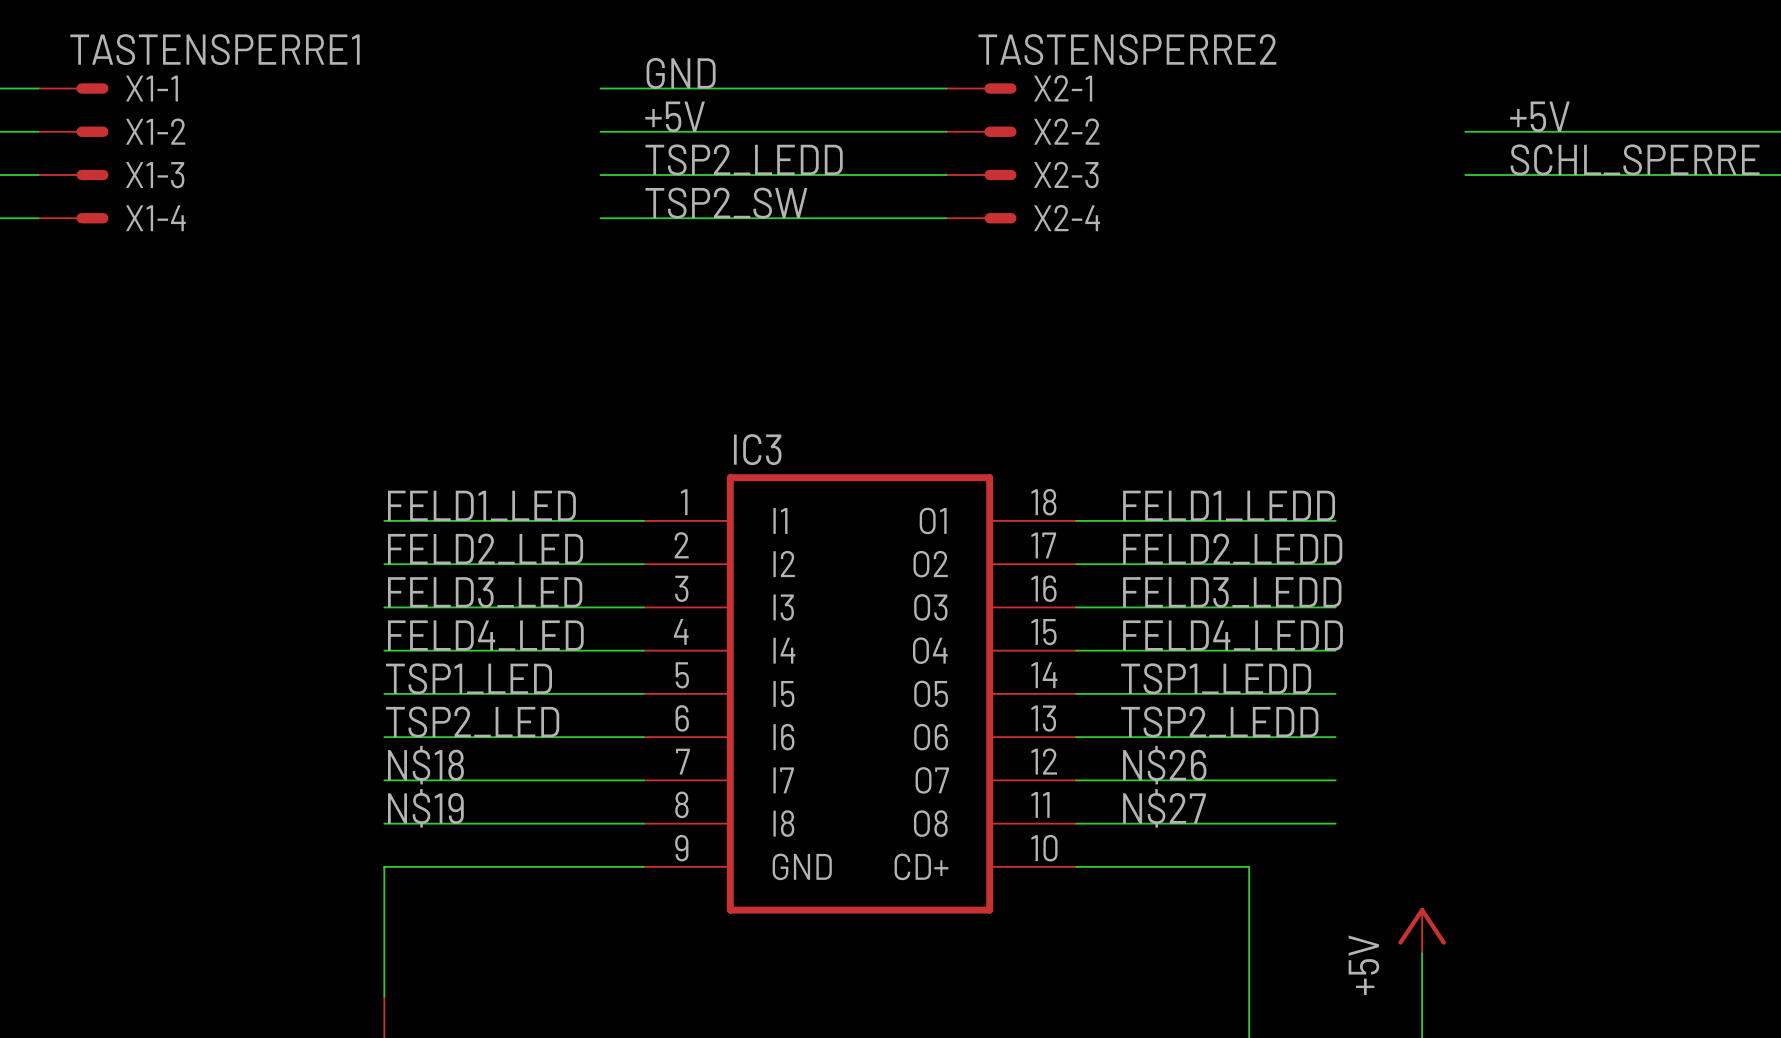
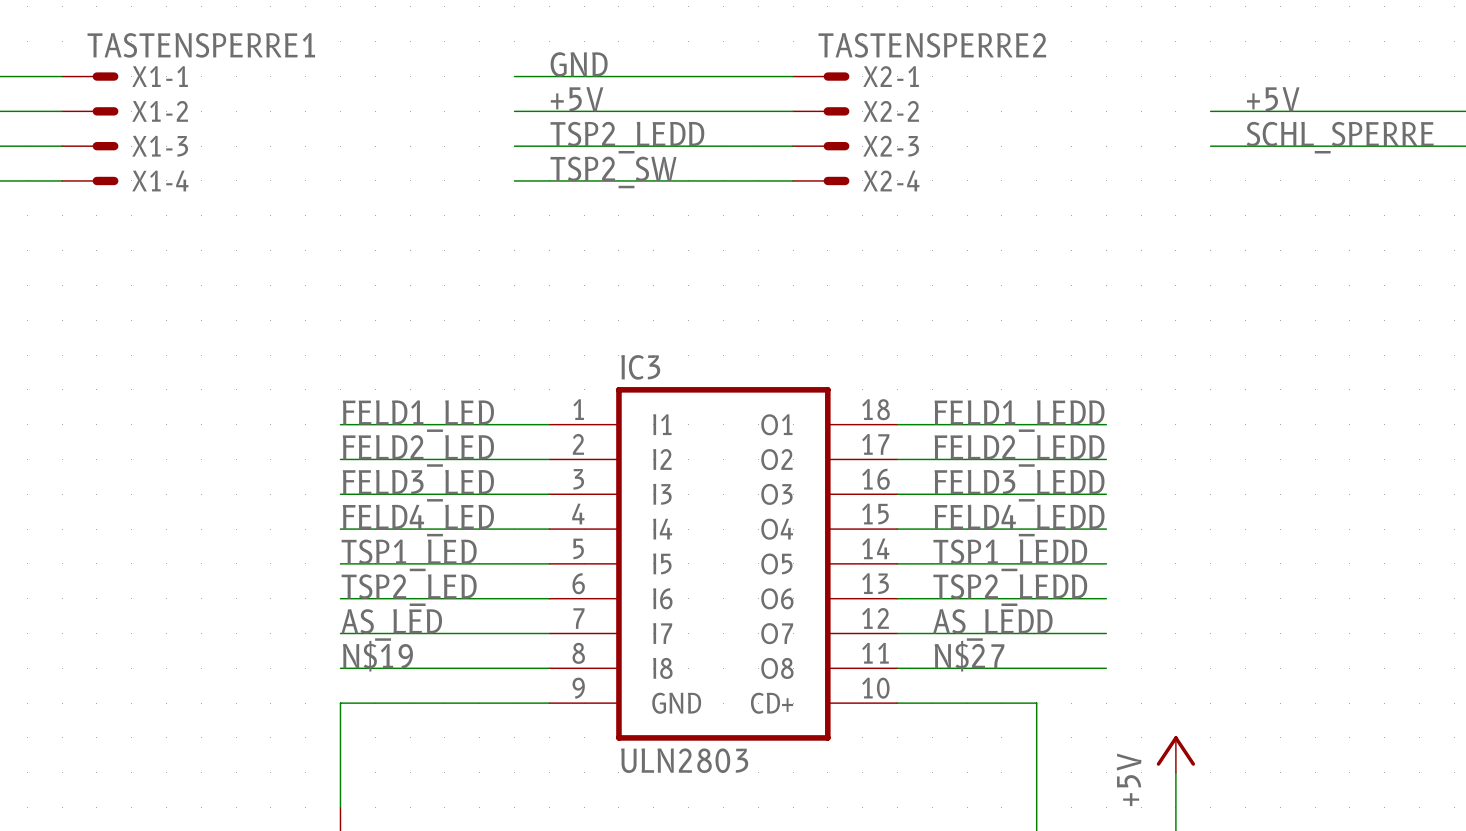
label: N$18 (425, 765) -> AS_LED (391, 624)
label: N$26 (1164, 765) -> AS_LEDD (992, 624)
IC3 value: none -> ULN2803 (684, 760)

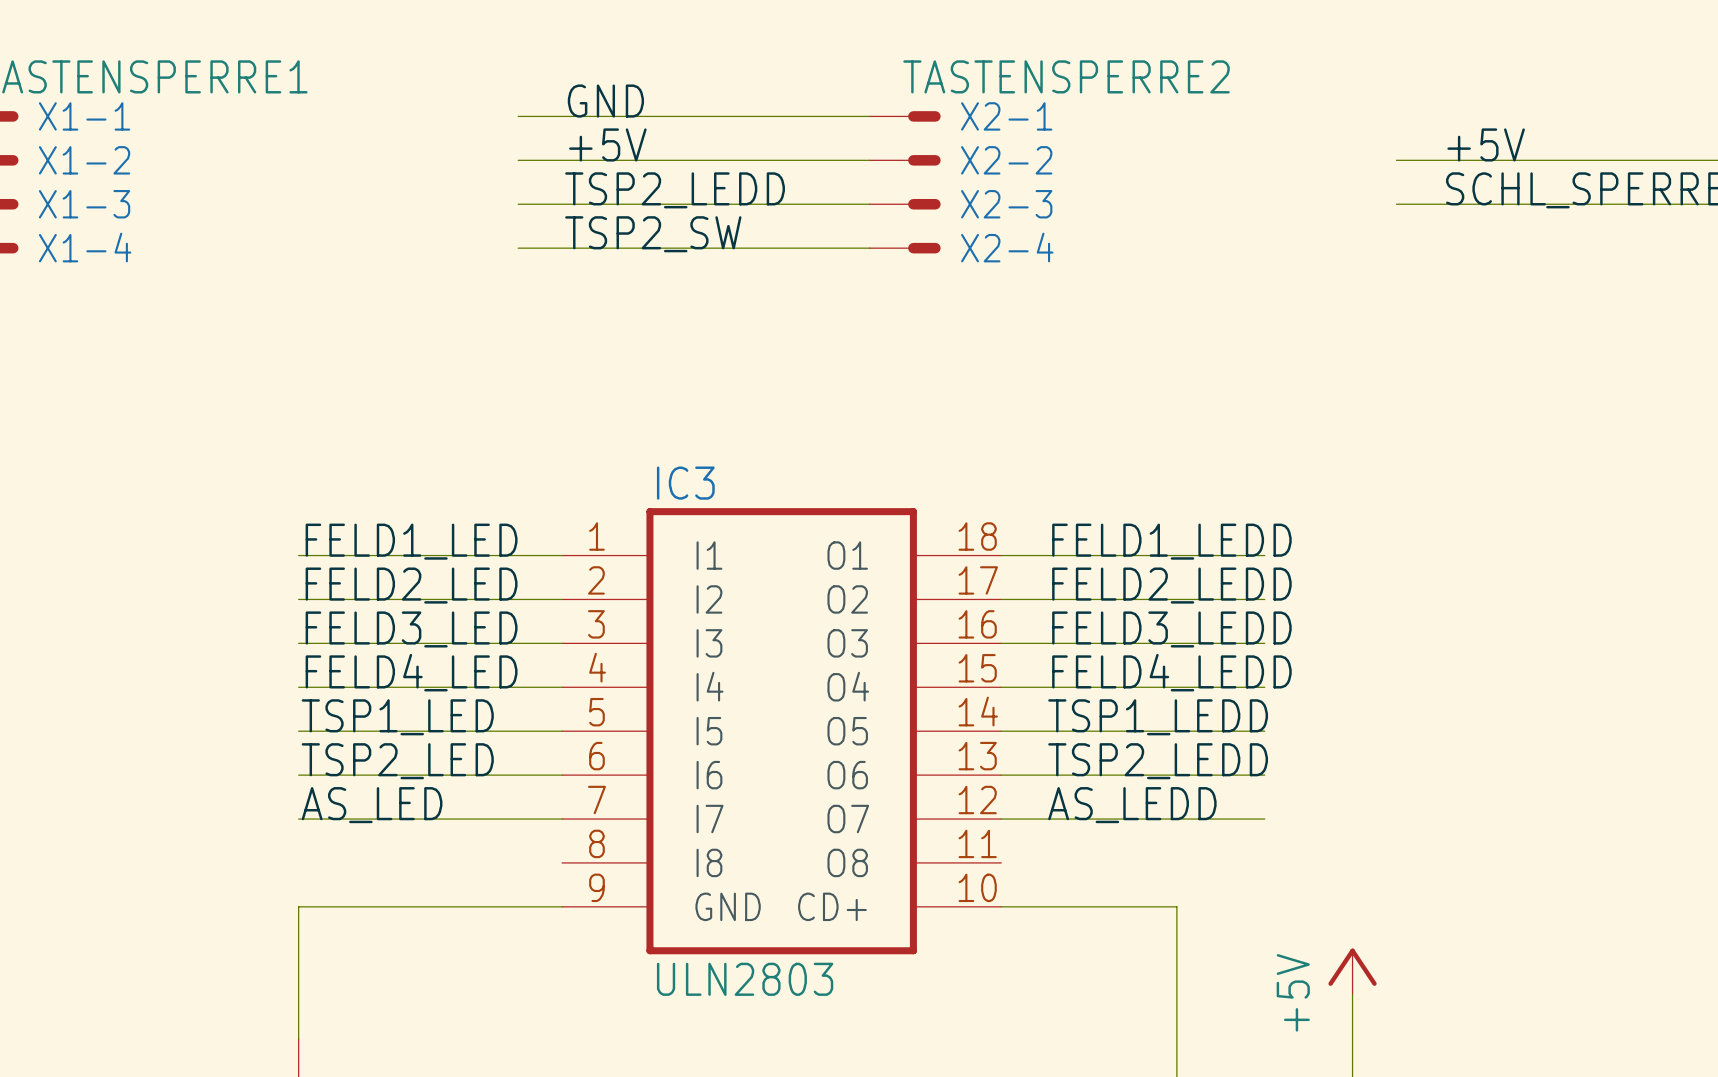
label: N$19 (377, 656) -> none
label: N$27 (969, 656) -> none
wire: (340, 668) (549, 668) -> none
wire: (897, 668) (1106, 668) -> none

